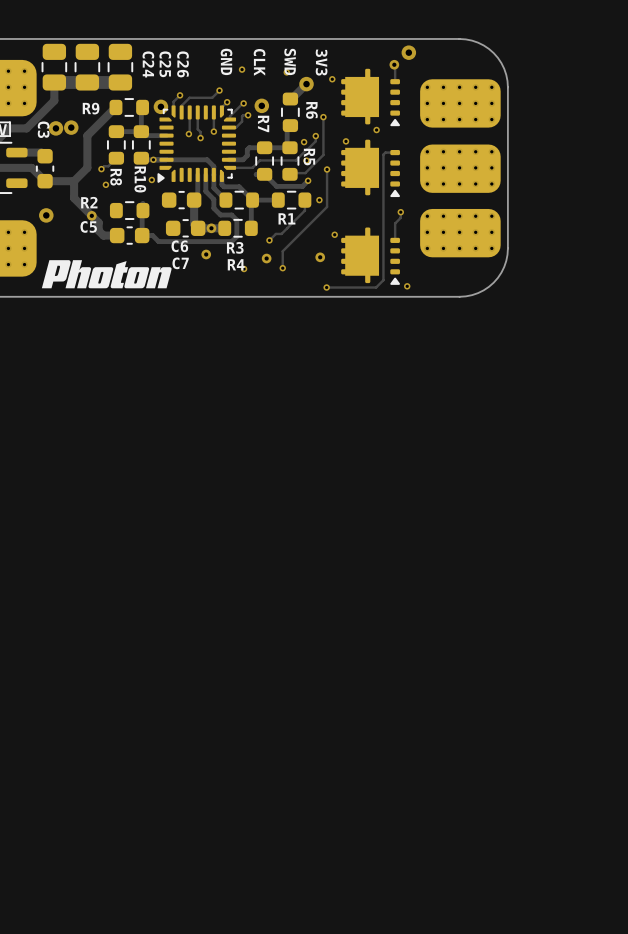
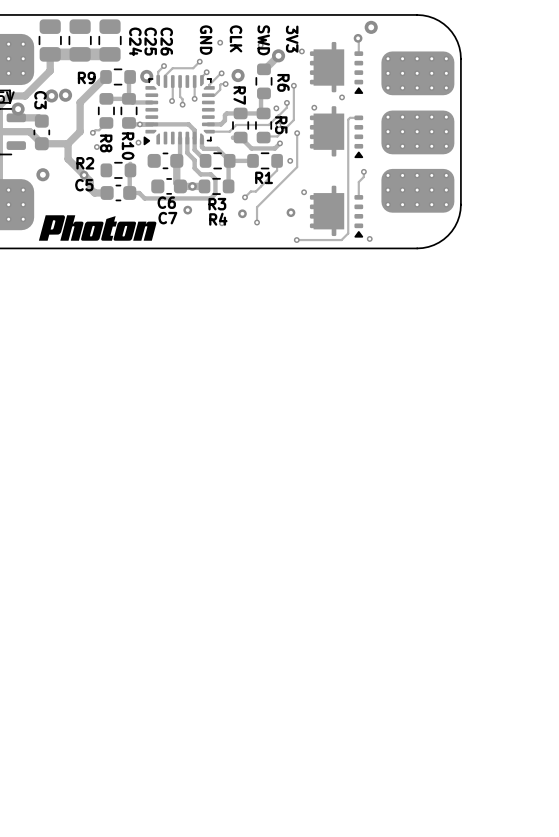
via: none -> (18, 109)

